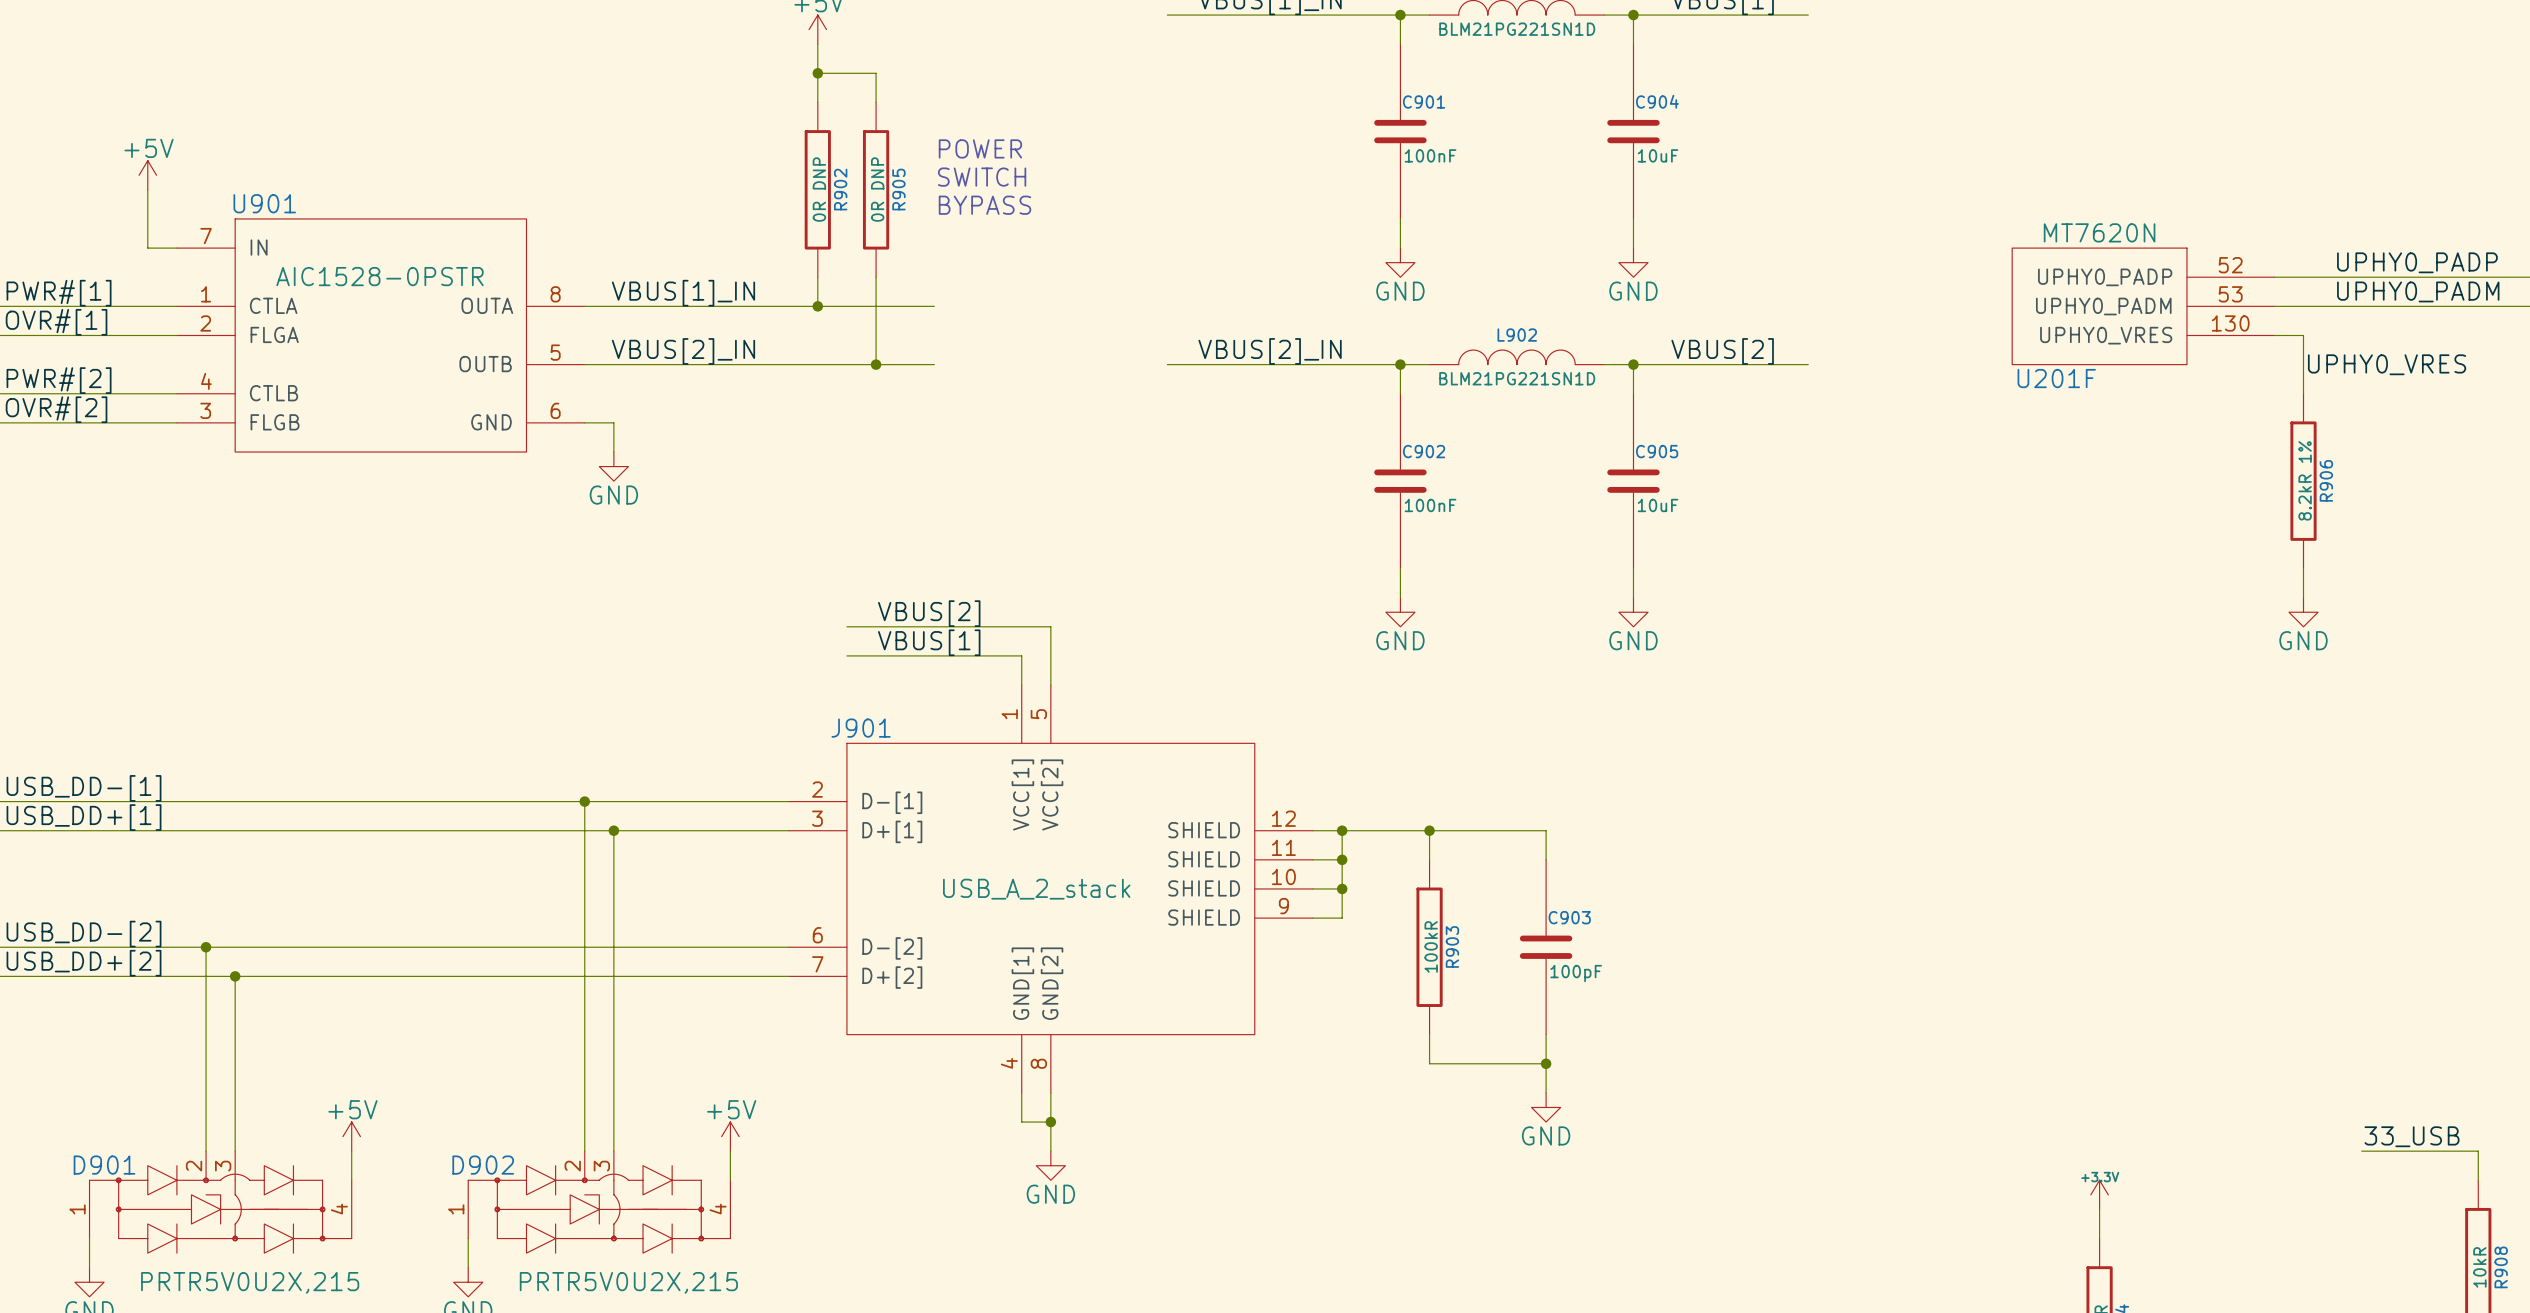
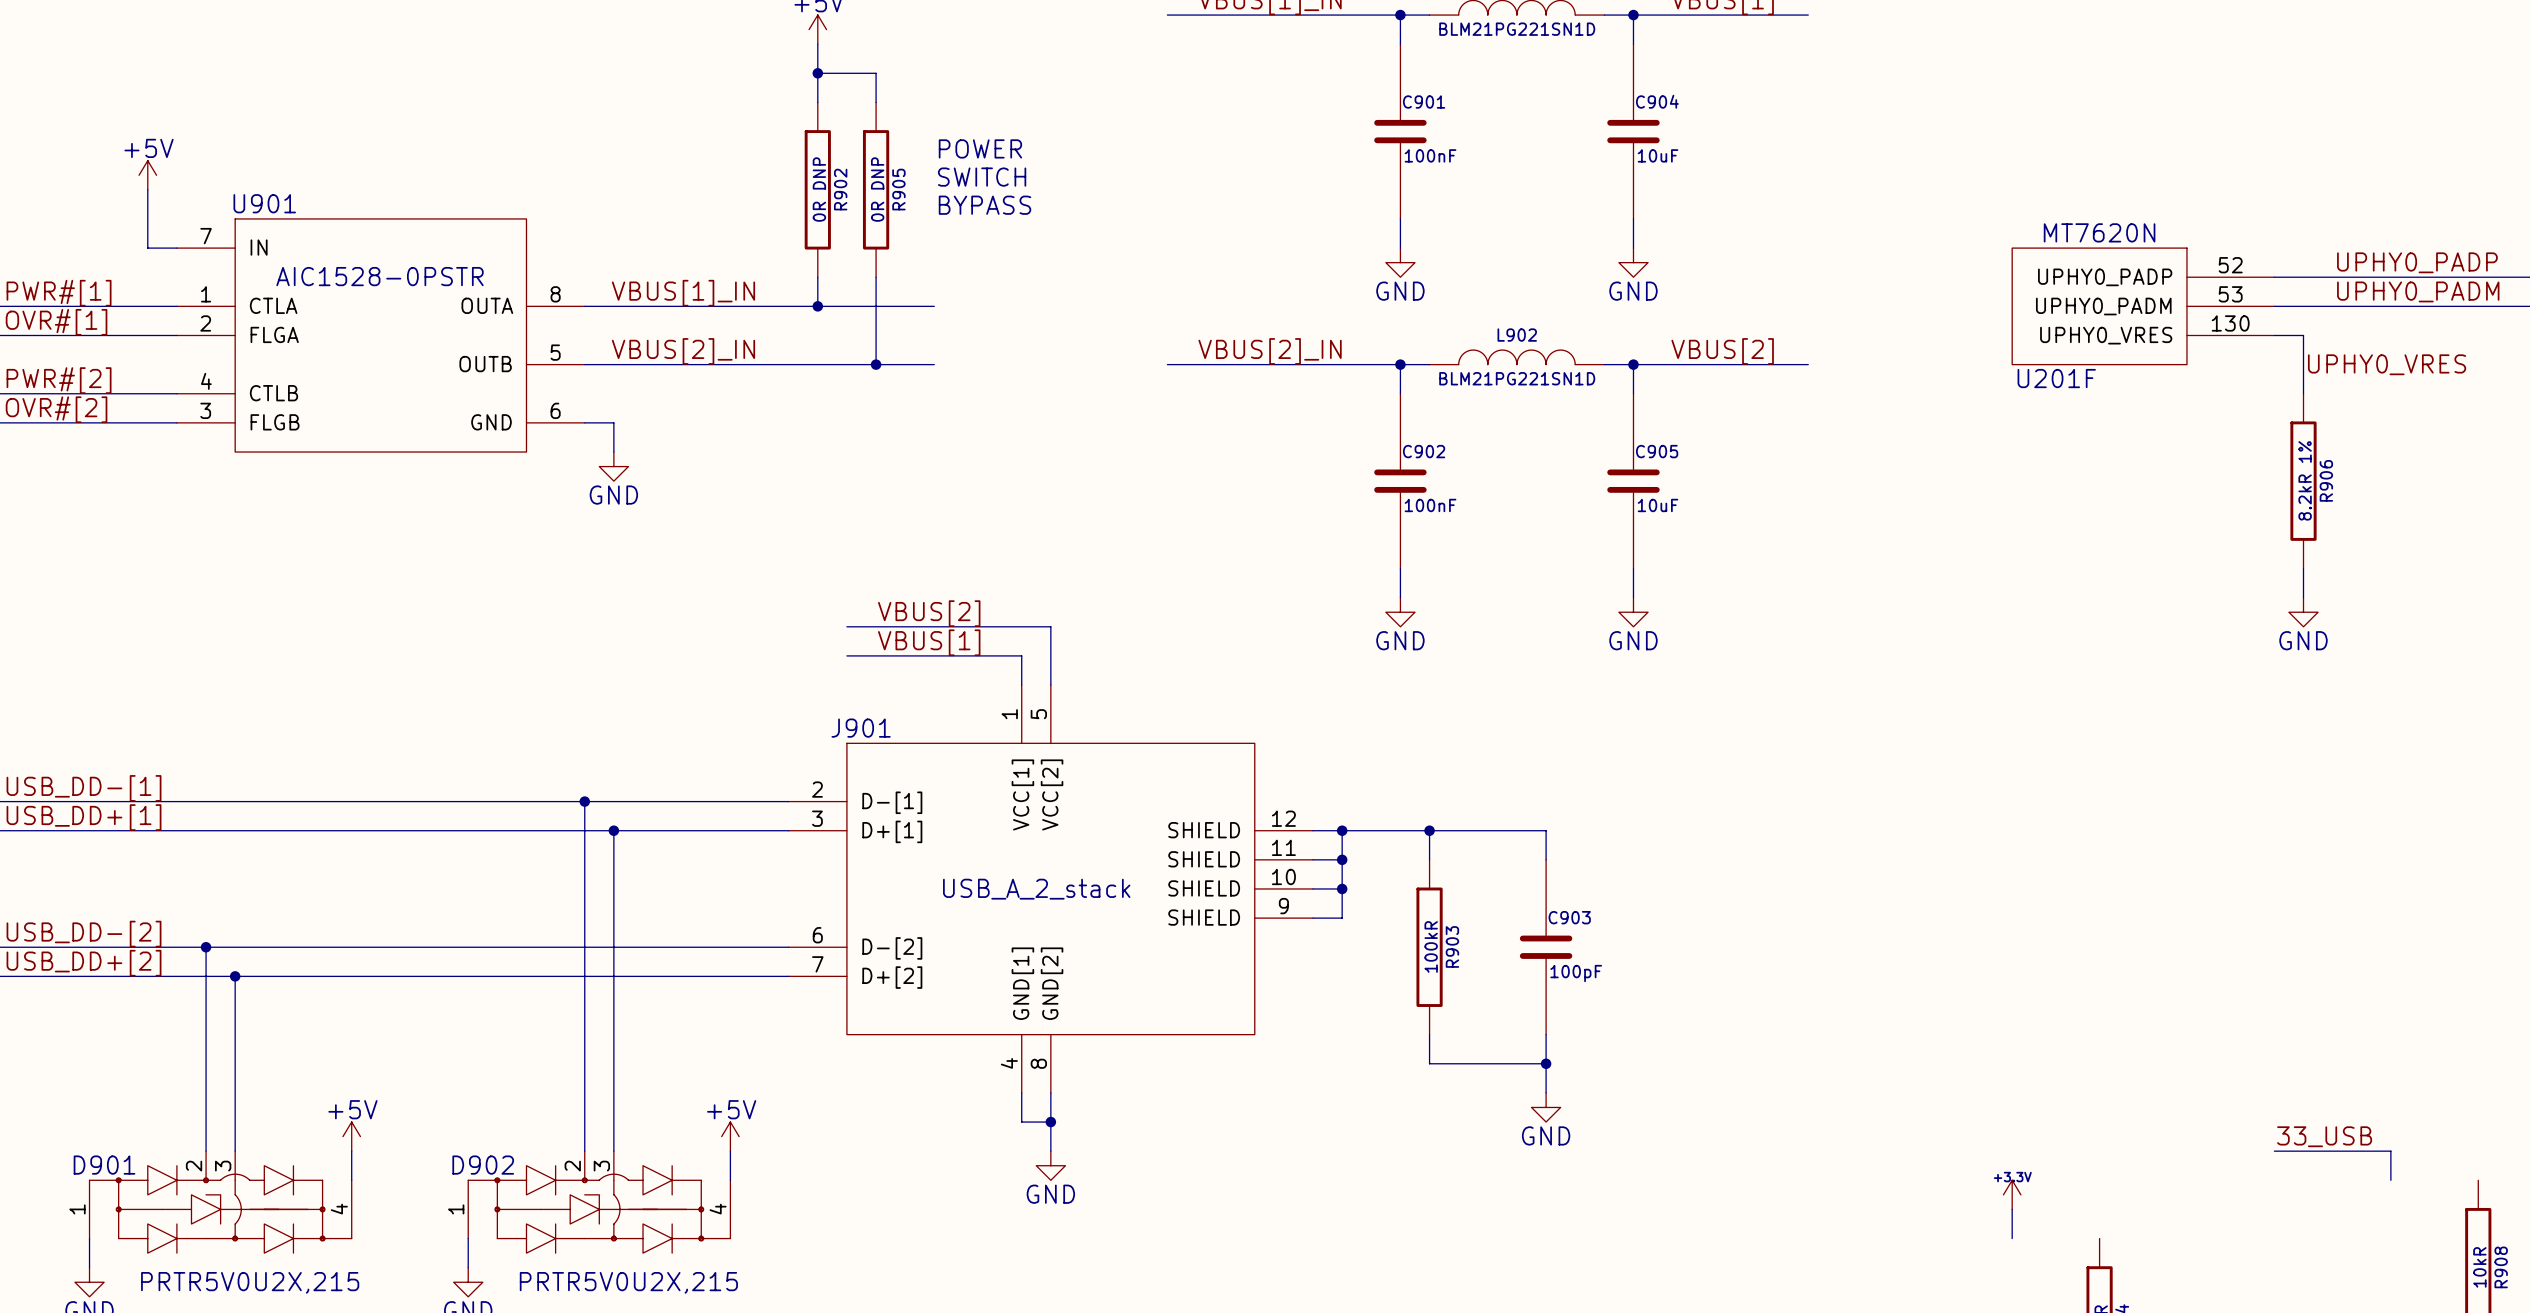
label position: 33_USB (2412, 1136) -> 33_USB (2324, 1136)
wire: none -> (2274, 1151) (2361, 1151)
wire: (2390, 1151) (2478, 1151) (2478, 1180) -> (2390, 1151) (2390, 1180)
power symbol position: +3.3V (2099, 1194) -> +3.3V (2012, 1194)
wire: (2099, 1209) (2099, 1238) -> (2012, 1209) (2012, 1238)

